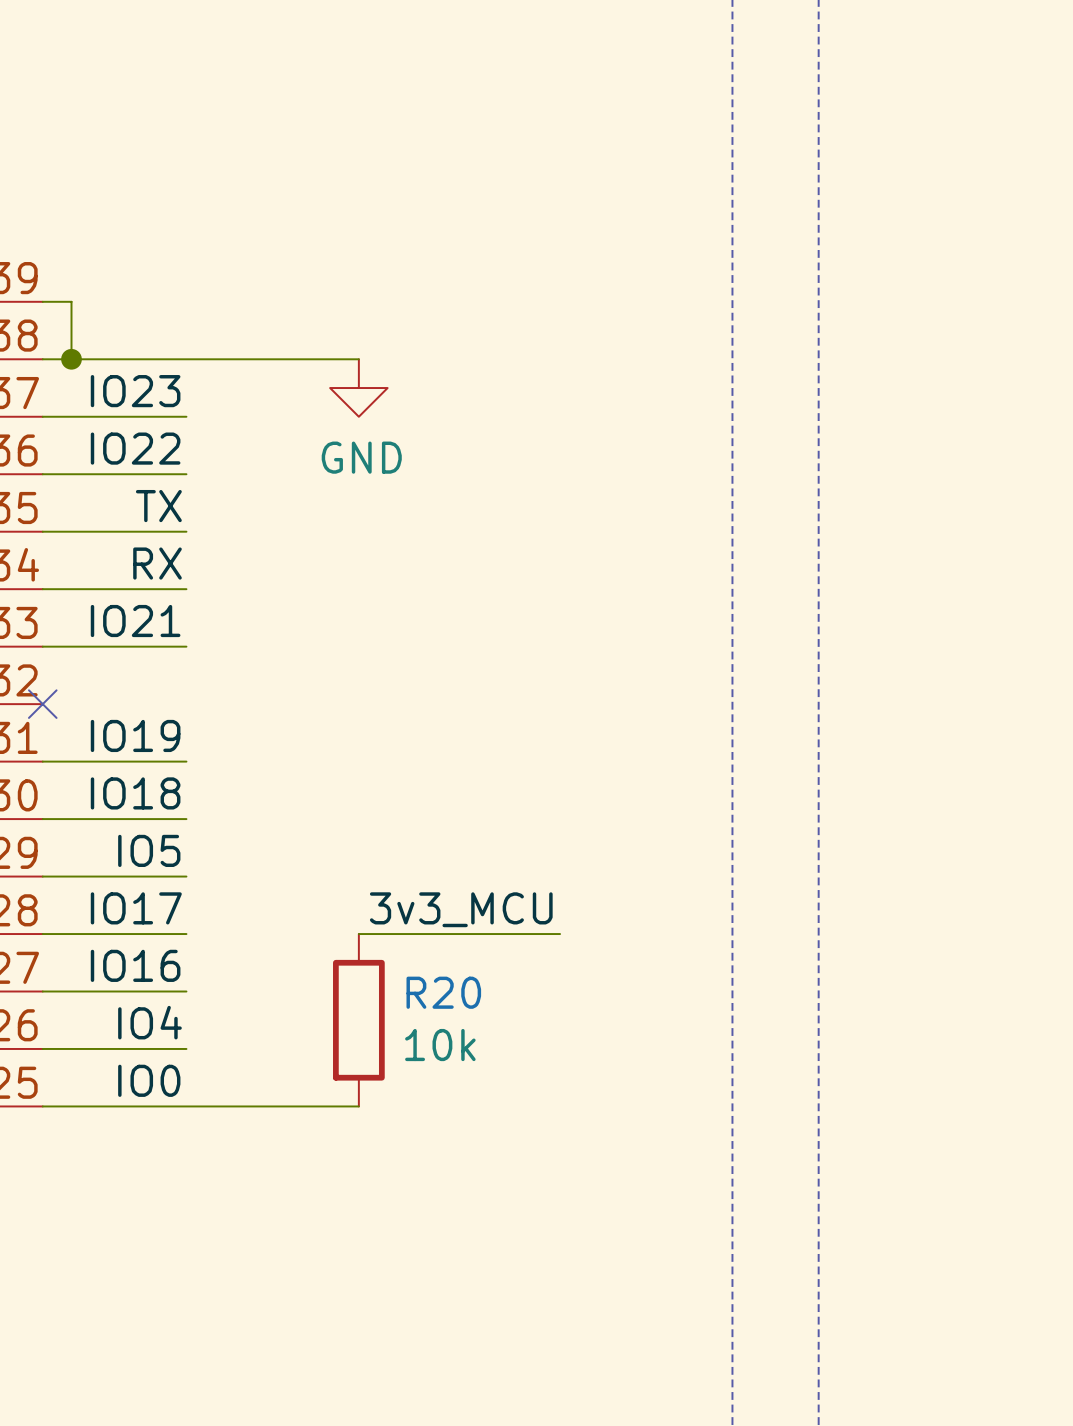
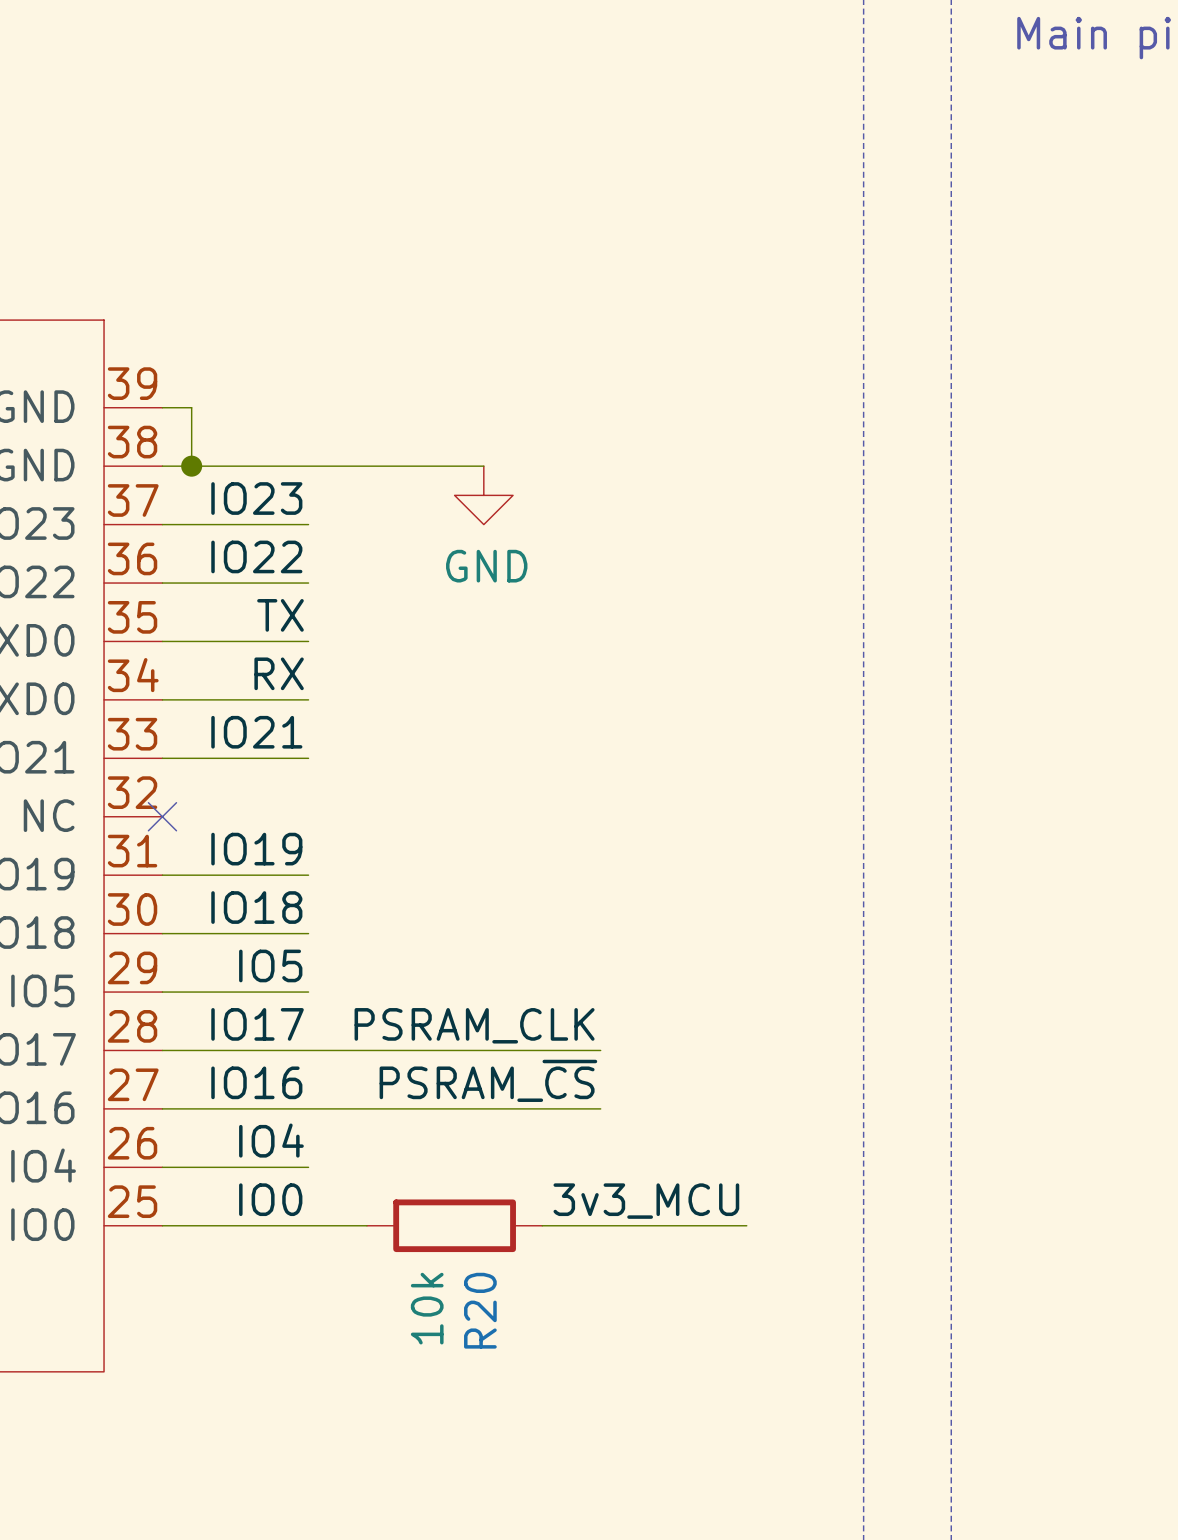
label: none -> PSRAM_CLK (474, 1025)
label position: 3v3_MCU (461, 909) -> 3v3_MCU (646, 1201)
wire: none -> (308, 1050) (483, 1050)
wire: (473, 934) (560, 934) -> none
label: none -> PSRAM_~{CS} (488, 1080)
wire: none -> (308, 1108) (600, 1108)
R20 rotation: 0° (358, 1020) -> 90° clockwise (454, 1225)
wire: (243, 1106) (358, 1106) -> none
wire: none -> (542, 1225) (746, 1225)

